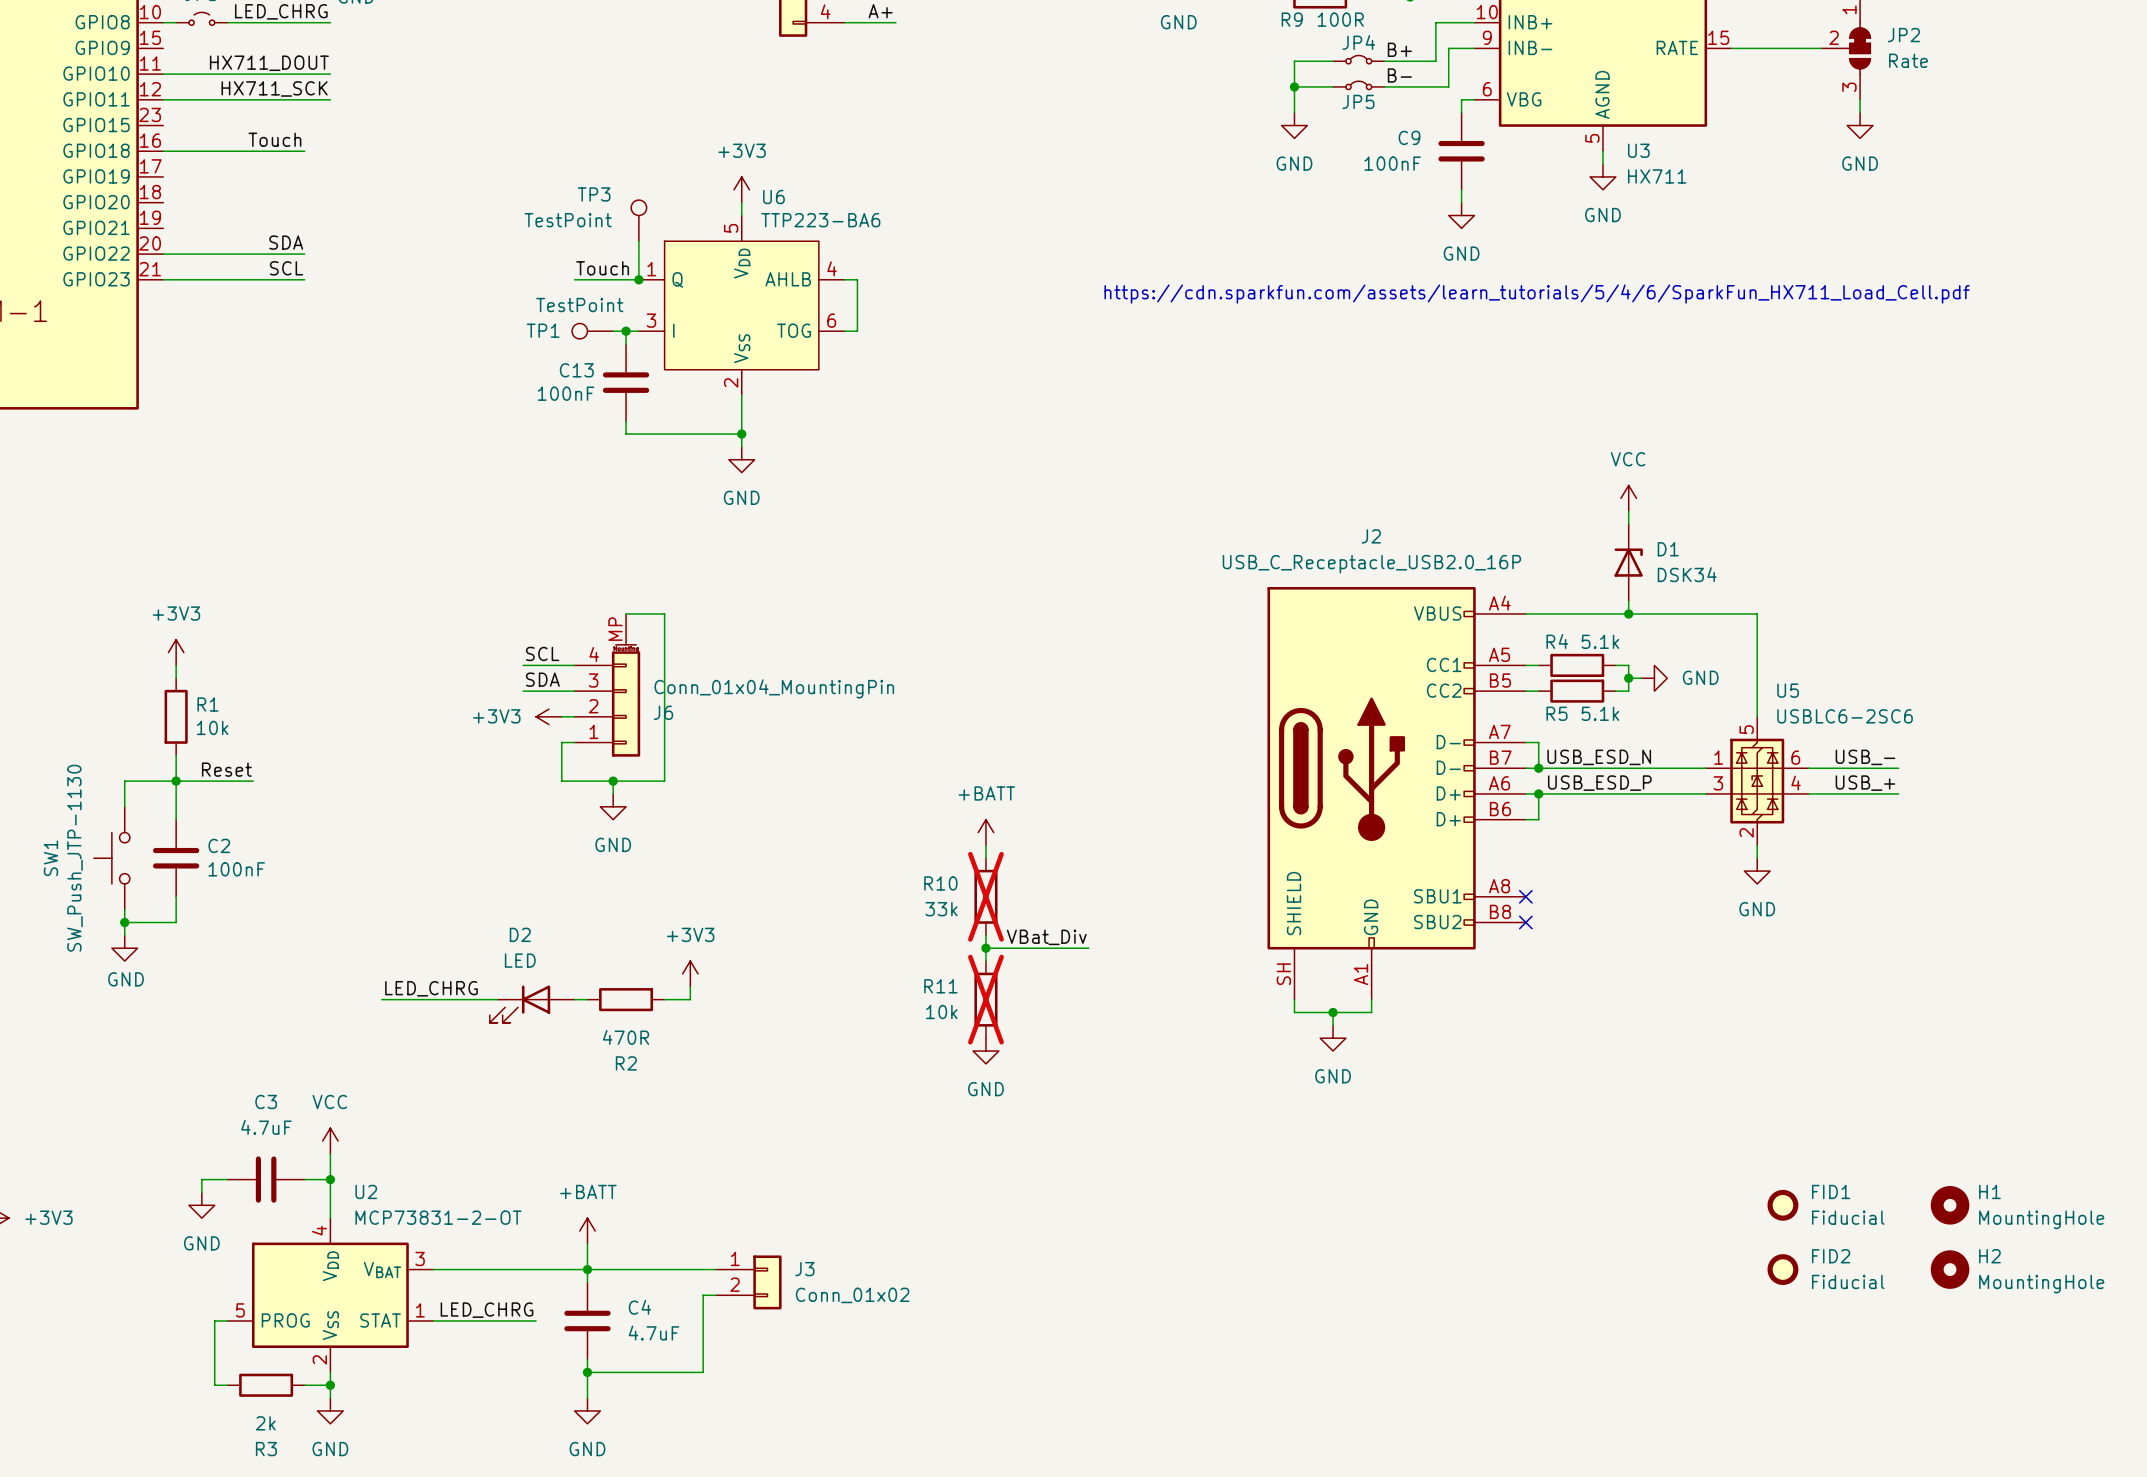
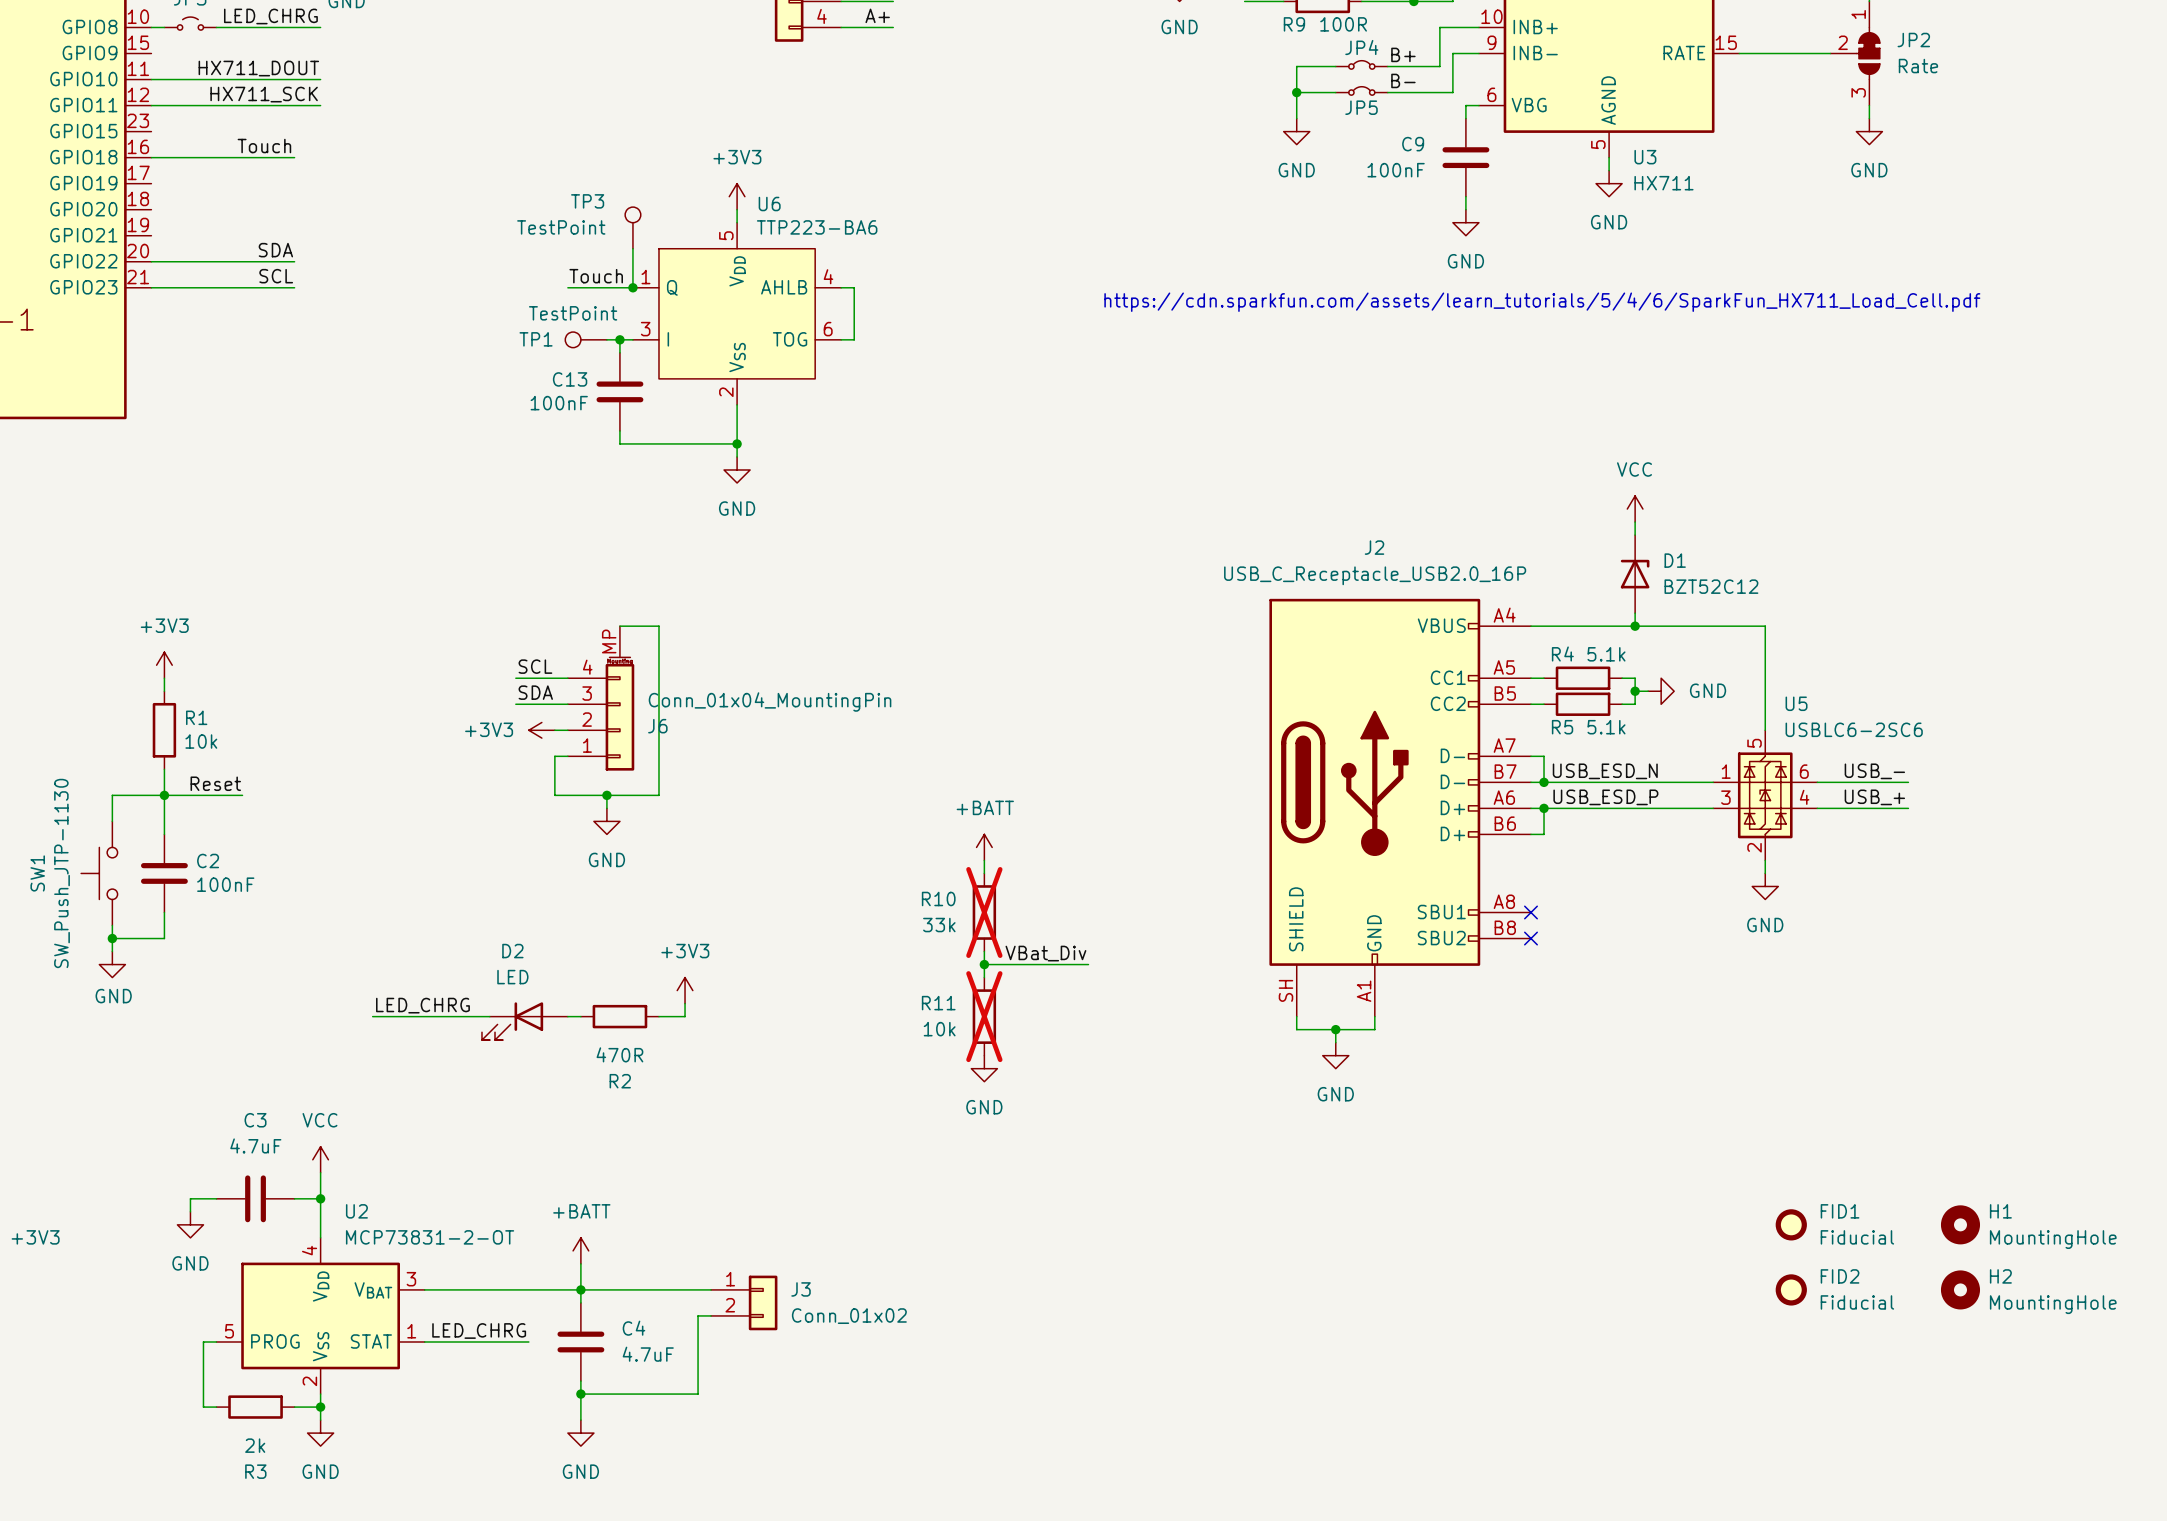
D1 value: DSK34 (1687, 574) -> BZT52C12 (1711, 586)

